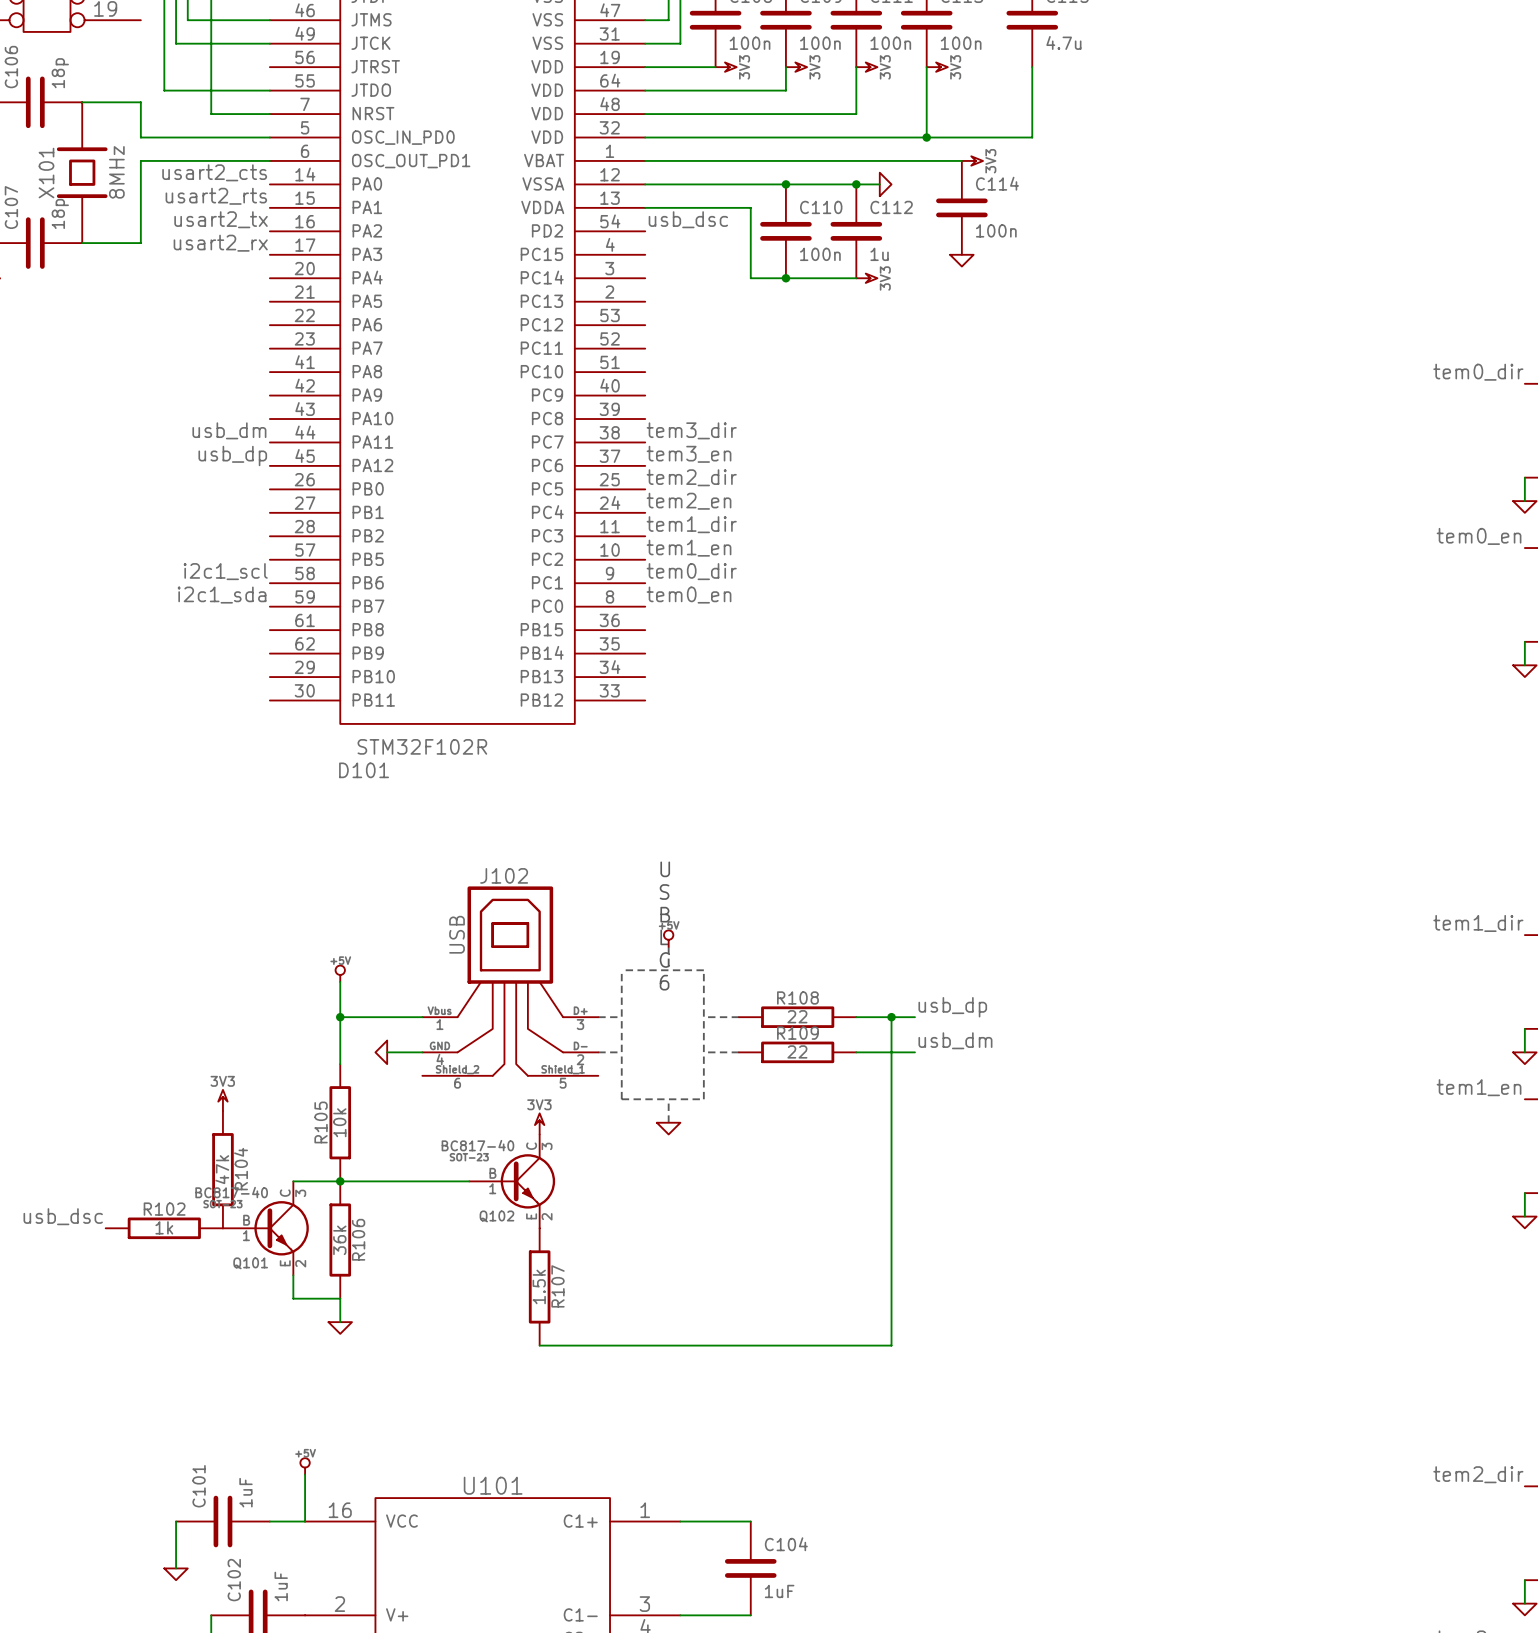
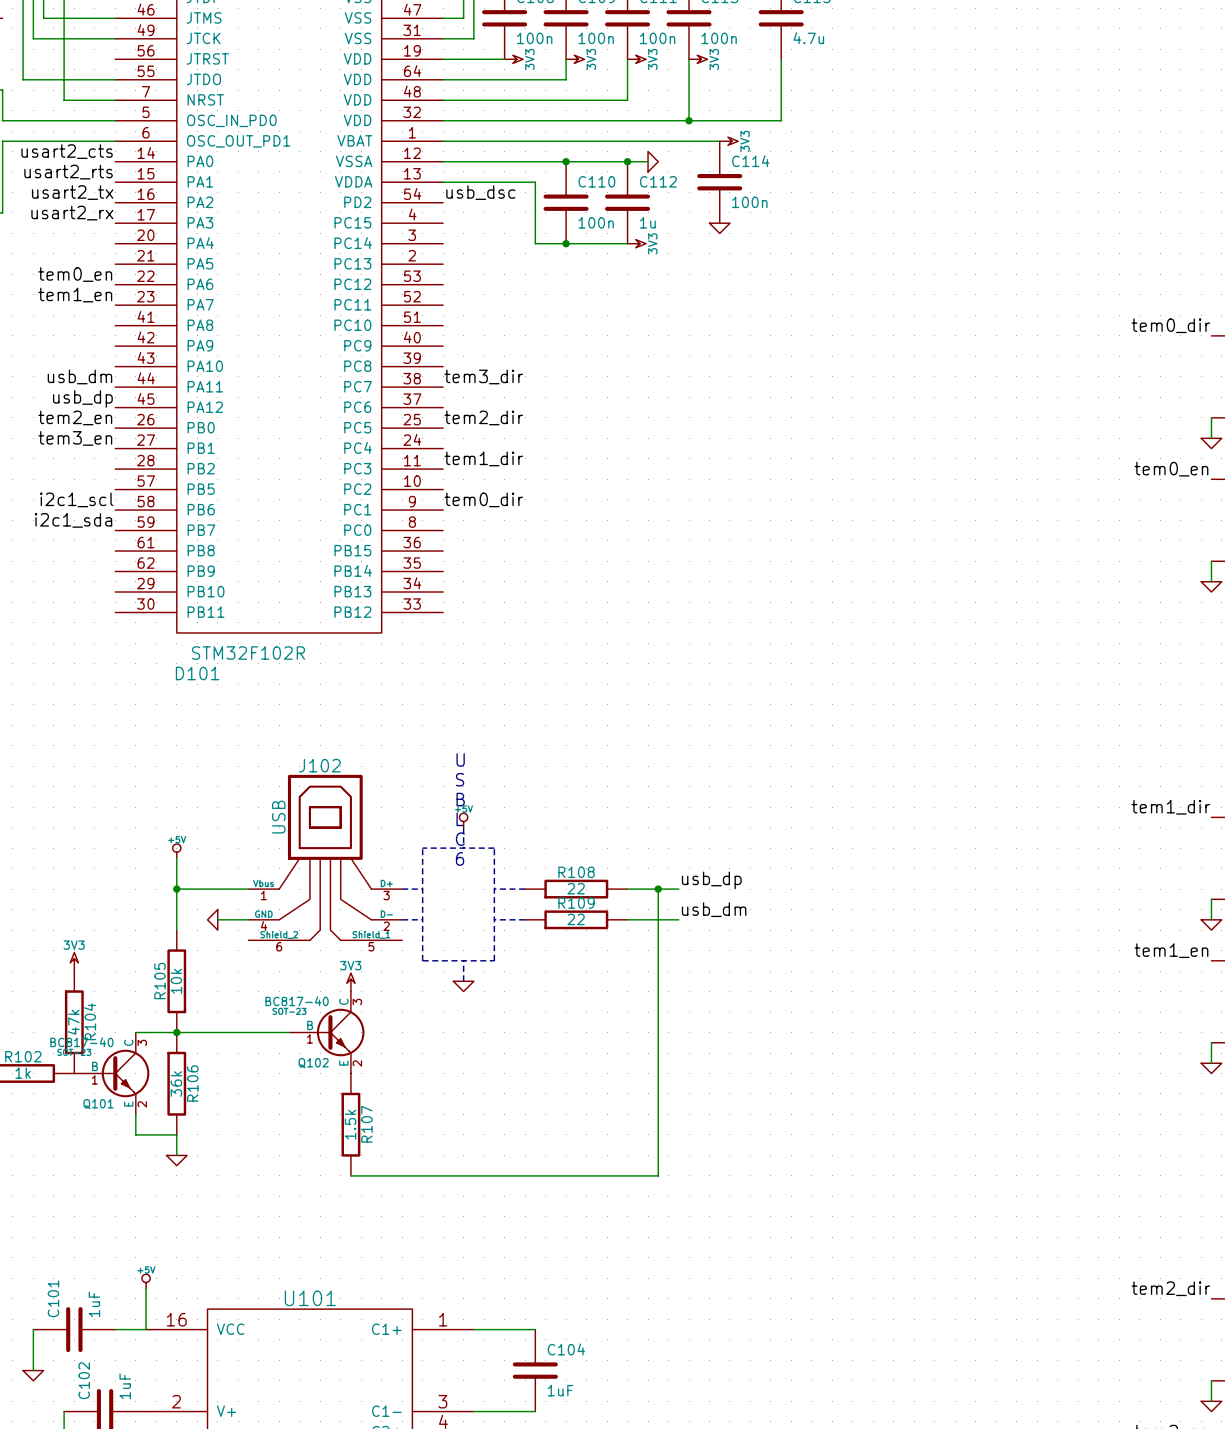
label: none -> tem0_en (75, 274)
label: none -> tem1_en (75, 295)
label: tem3_en (689, 454) -> none
label: none -> tem2_en (75, 417)
label: none -> tem3_en (75, 438)
label: tem2_en (689, 501) -> none
label: tem1_en (689, 548) -> none
label: tem0_en (689, 595) -> none

